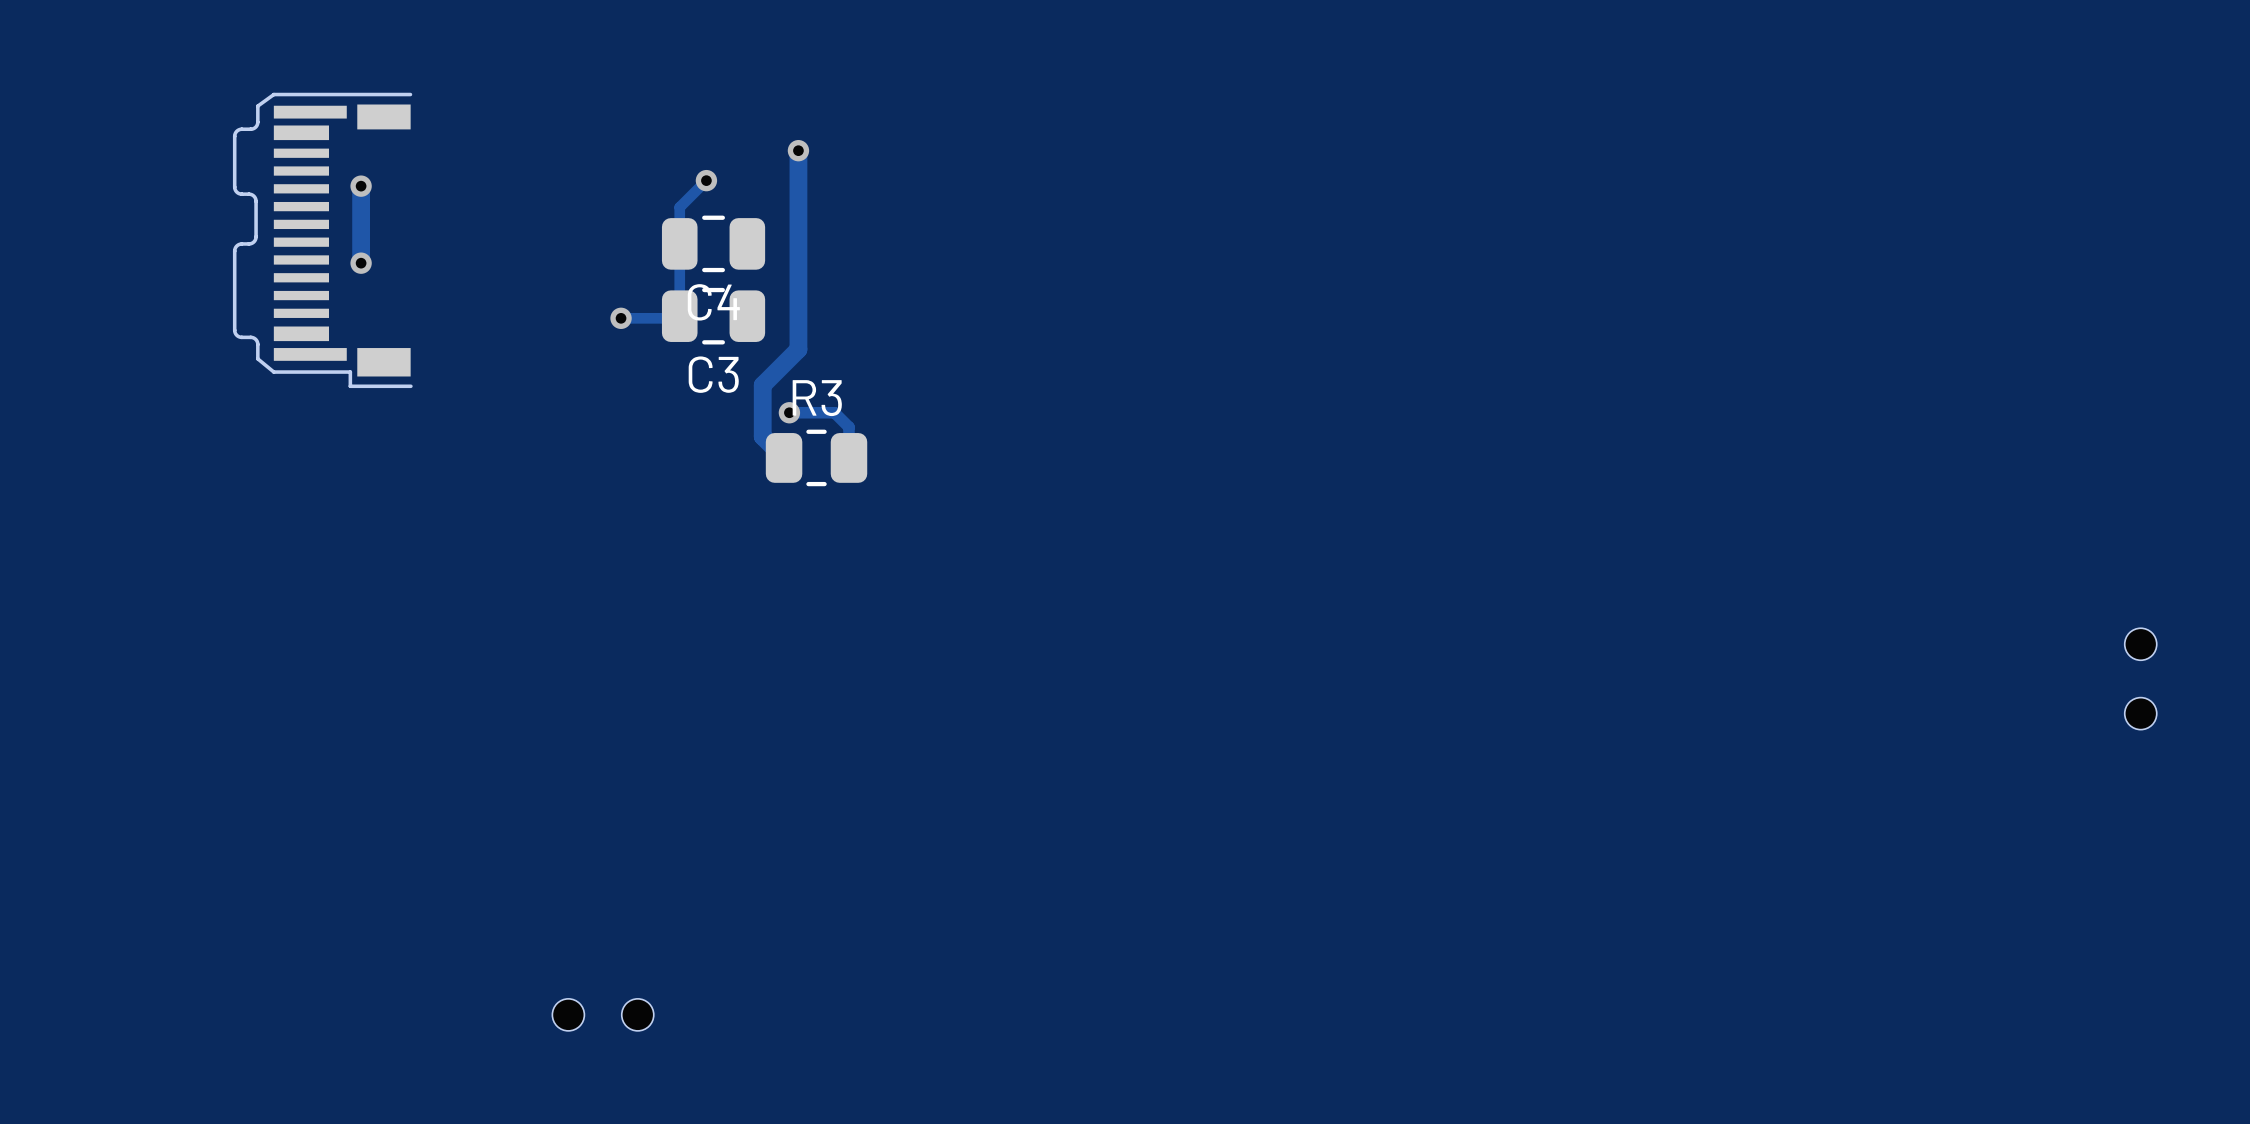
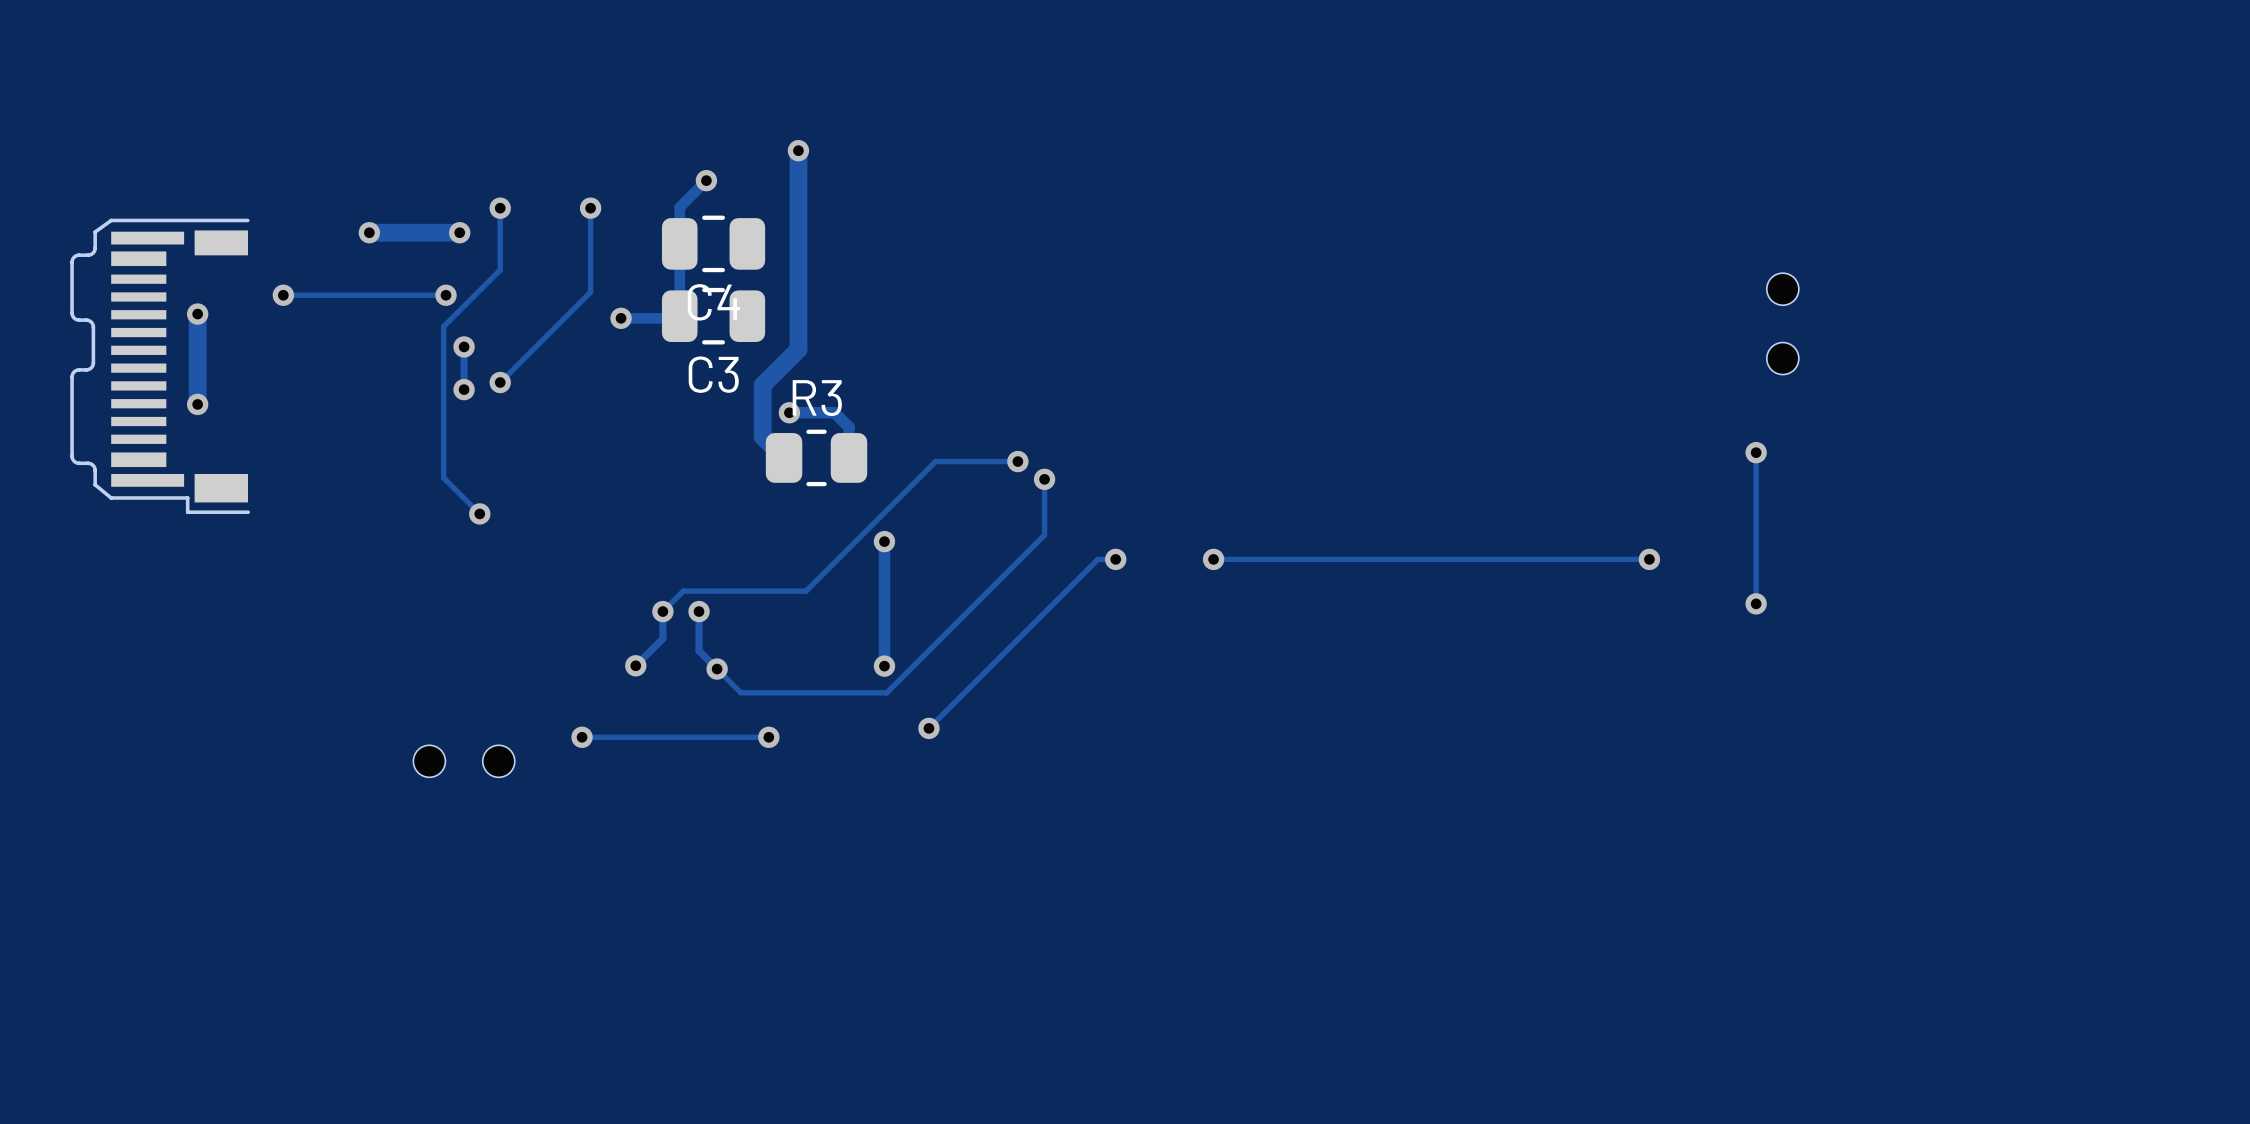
track: (361, 186) (361, 263) -> none
via: (361, 186) -> none
track: none -> (500, 208) (500, 269) (443, 326) (443, 477) (479, 513)
via: none -> (500, 208)
track: none -> (590, 208) (590, 292) (500, 382)
via: none -> (590, 208)
via: none -> (369, 232)
track: none -> (459, 232) (369, 232)
via: none -> (459, 232)
part position: (322, 240) -> (160, 366)
via: (361, 263) -> none
via: none -> (283, 295)
track: none -> (446, 295) (283, 295)
via: none -> (446, 295)
track: none -> (197, 314) (197, 404)
via: none -> (197, 314)
track: none -> (464, 346) (464, 389)
via: none -> (464, 346)
via: none -> (500, 382)
via: none -> (464, 389)
via: none -> (197, 404)
track: none -> (1756, 452) (1756, 603)
via: none -> (1756, 452)
track: none -> (1017, 461) (935, 461) (806, 591) (683, 591) (662, 611) (662, 638) (635, 665)
via: none -> (1017, 461)
track: none -> (1044, 479) (1044, 534) (886, 692) (740, 692) (699, 650) (699, 611)
via: none -> (1044, 479)
via: none -> (479, 513)
track: none -> (884, 541) (884, 666)
via: none -> (884, 541)
track: none -> (1115, 559) (1097, 559) (928, 728)
via: none -> (1115, 559)
via: none -> (1213, 559)
track: none -> (1649, 559) (1213, 559)
via: none -> (1649, 559)
via: none -> (1756, 603)
via: none -> (662, 611)
via: none -> (699, 611)
via: none -> (635, 665)
via: none -> (884, 666)
via: none -> (717, 669)
part position: (2140, 678) -> (1782, 323)
via: none -> (928, 728)
via: none -> (582, 737)
track: none -> (768, 737) (582, 737)
via: none -> (768, 737)
part position: (603, 1014) -> (464, 761)

